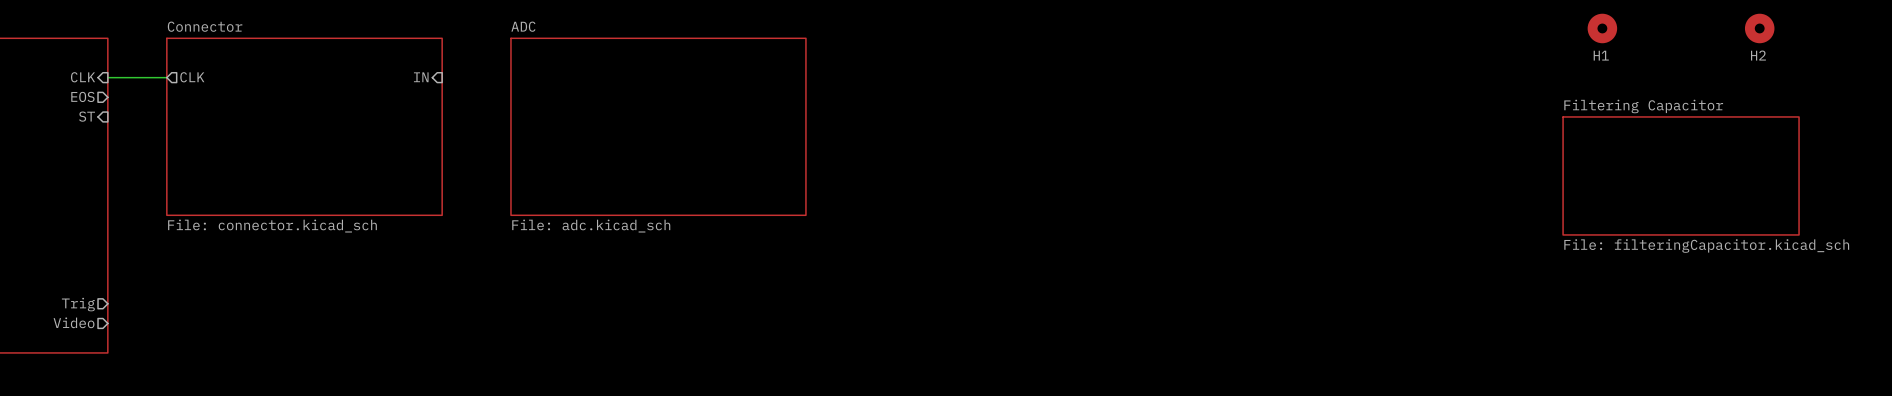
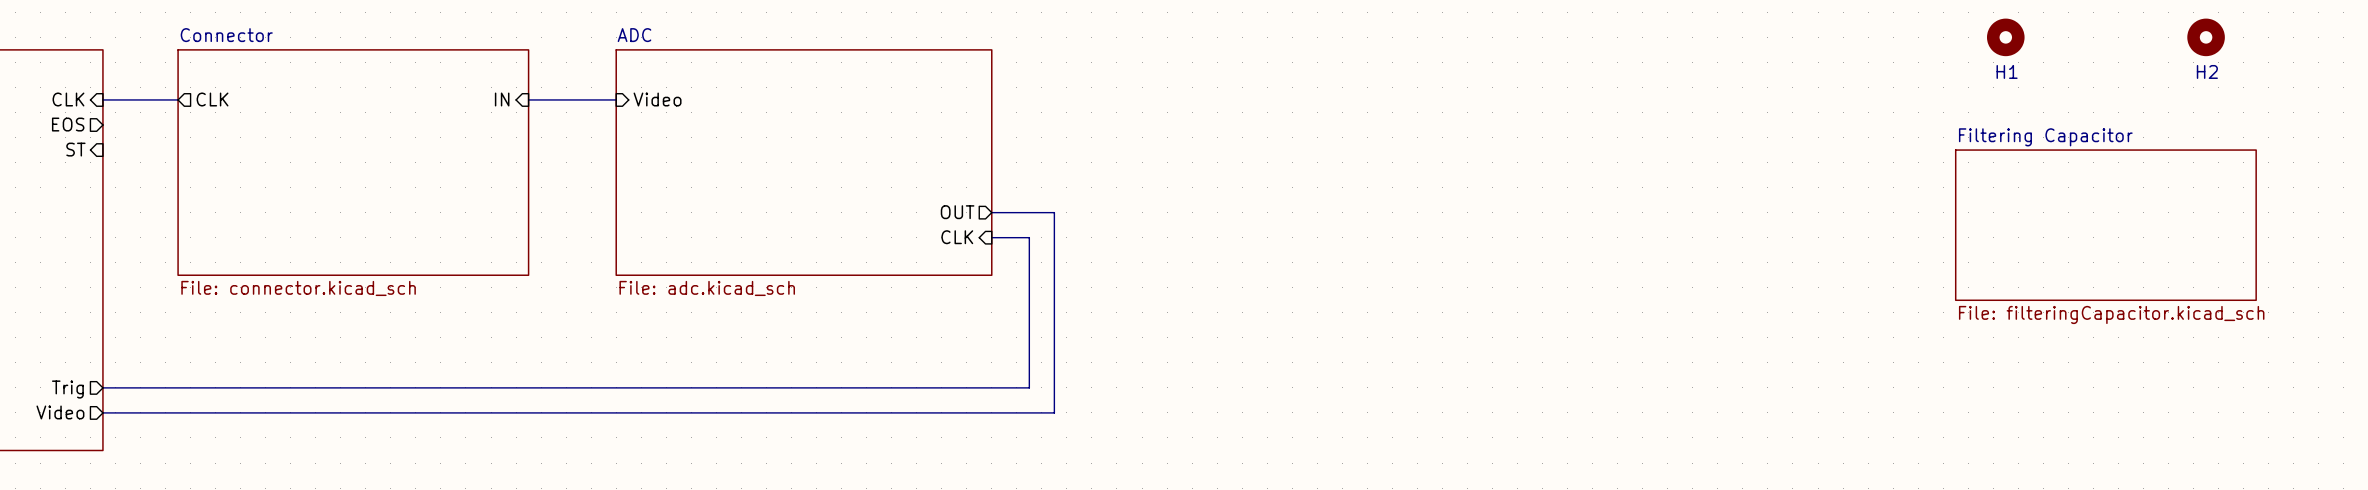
wire: none -> (528, 99) (616, 99)
sheet pin: none -> Video (657, 99)
sheet pin: none -> OUT (957, 212)
wire: none -> (991, 212) (1054, 212) (1054, 412) (102, 412)
sheet pin: none -> CLK (957, 237)
wire: none -> (991, 237) (1029, 237) (1029, 387) (102, 387)

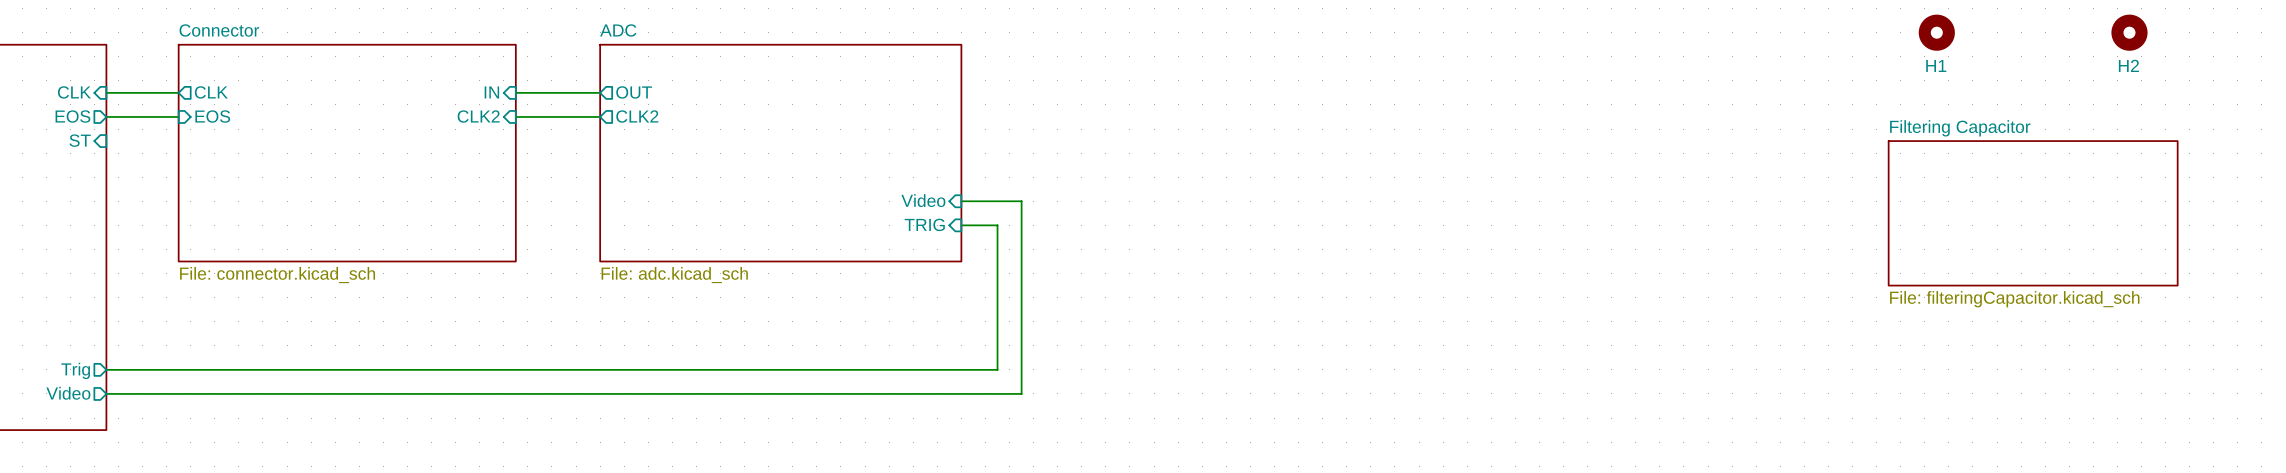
sheet pin shape: input (657, 99) -> output (634, 92)
sheet pin: Video (657, 99) -> OUT (634, 92)
sheet pin: none -> EOS (212, 116)
sheet pin: none -> CLK2 (478, 116)
sheet pin: none -> CLK2 (637, 116)
wire: none -> (106, 116) (178, 116)
wire: none -> (515, 116) (600, 116)
sheet pin shape: output (957, 212) -> input (923, 200)
sheet pin: OUT (957, 212) -> Video (923, 200)
sheet pin: CLK (957, 237) -> TRIG (924, 224)

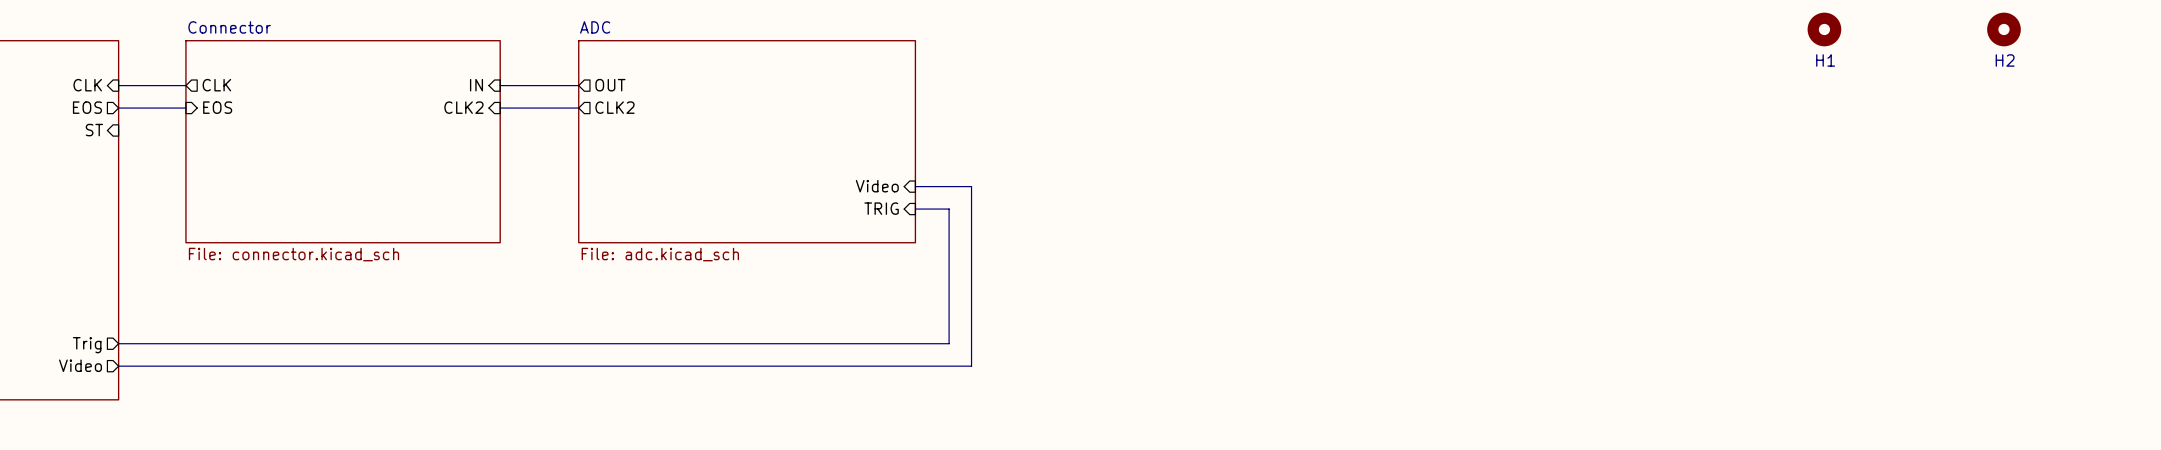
sheet Filtering Capacitor: File: filteringCapacitor.kicad_sch (2033, 213) -> none

